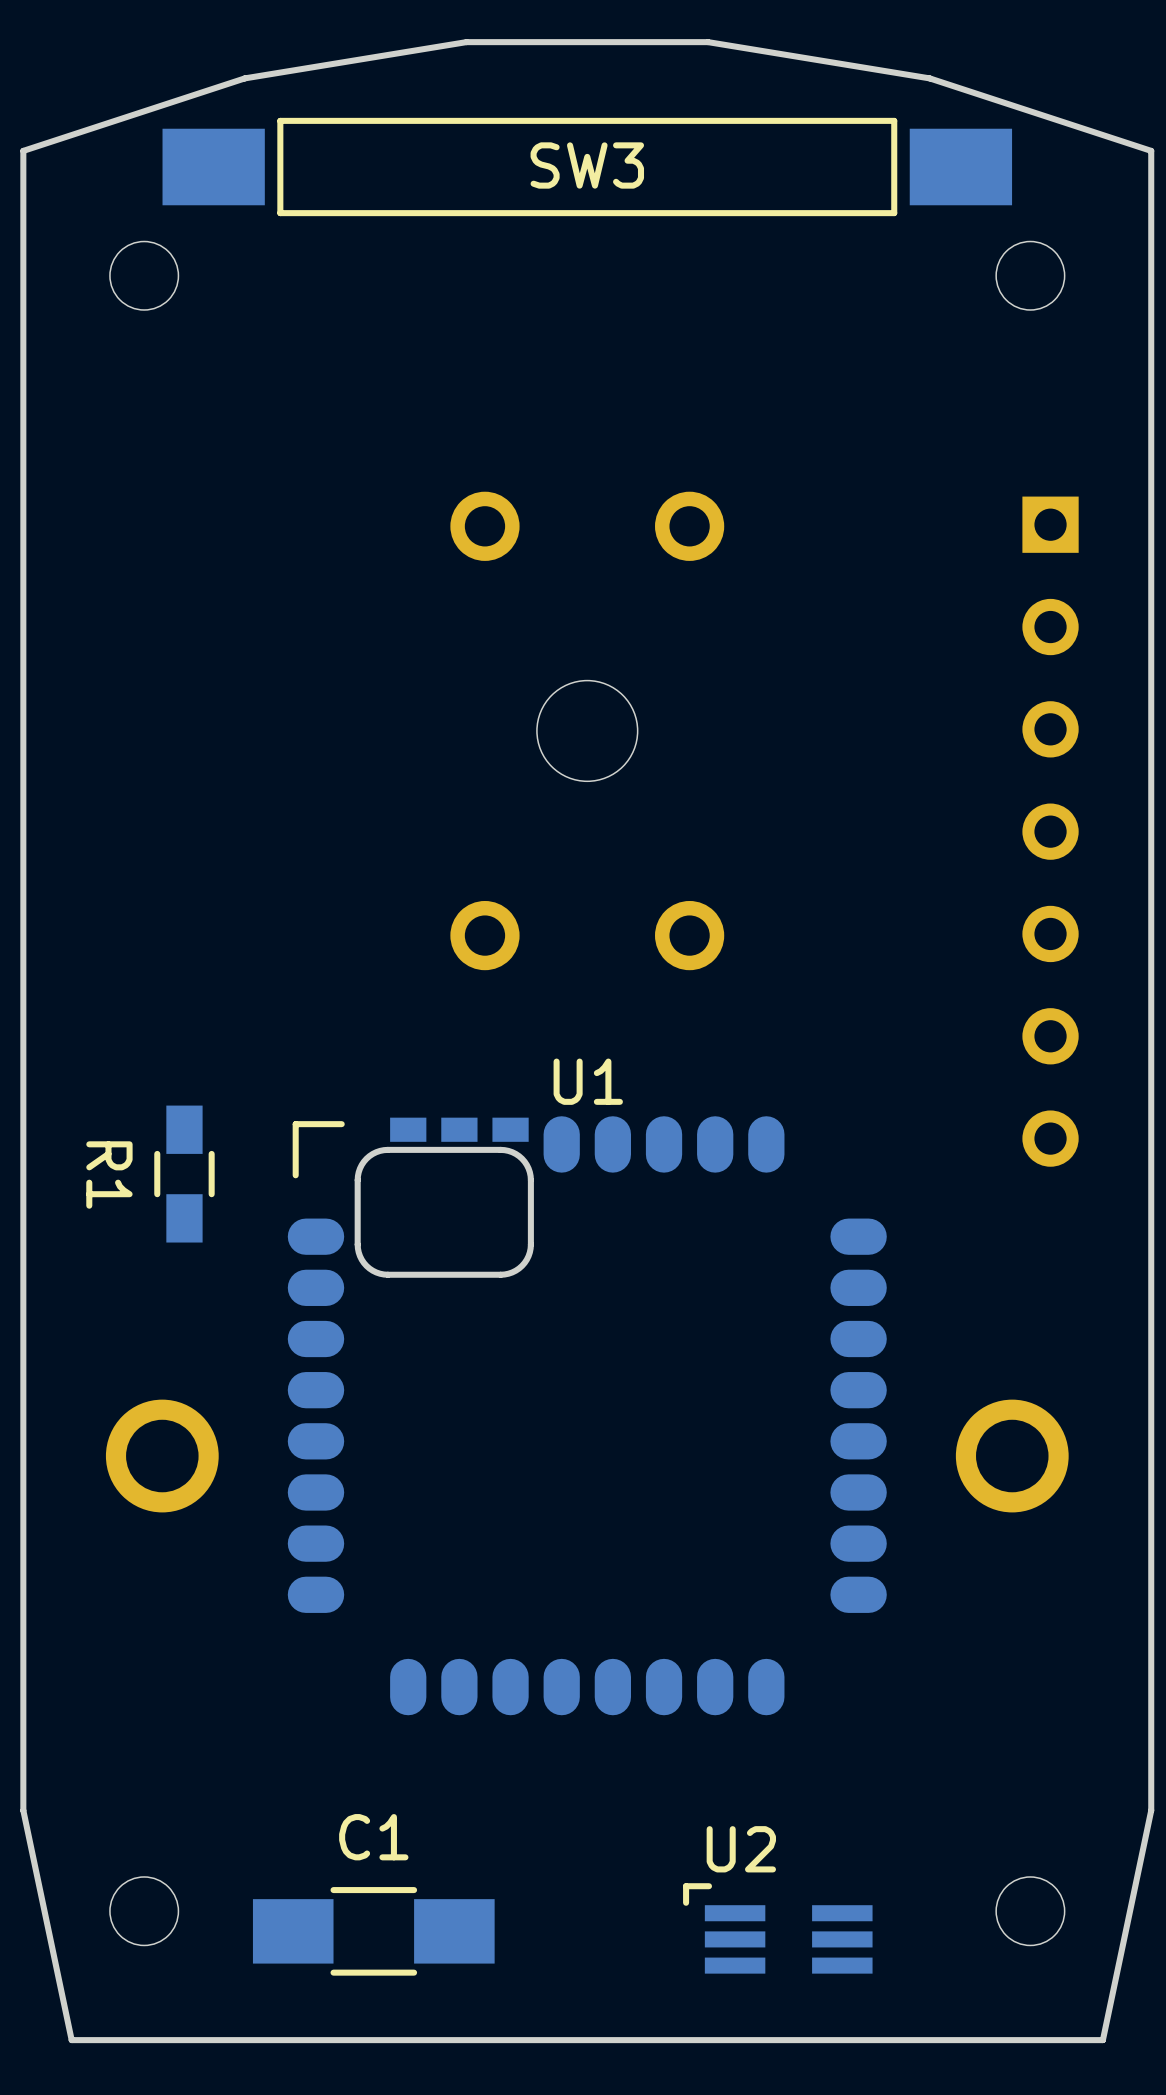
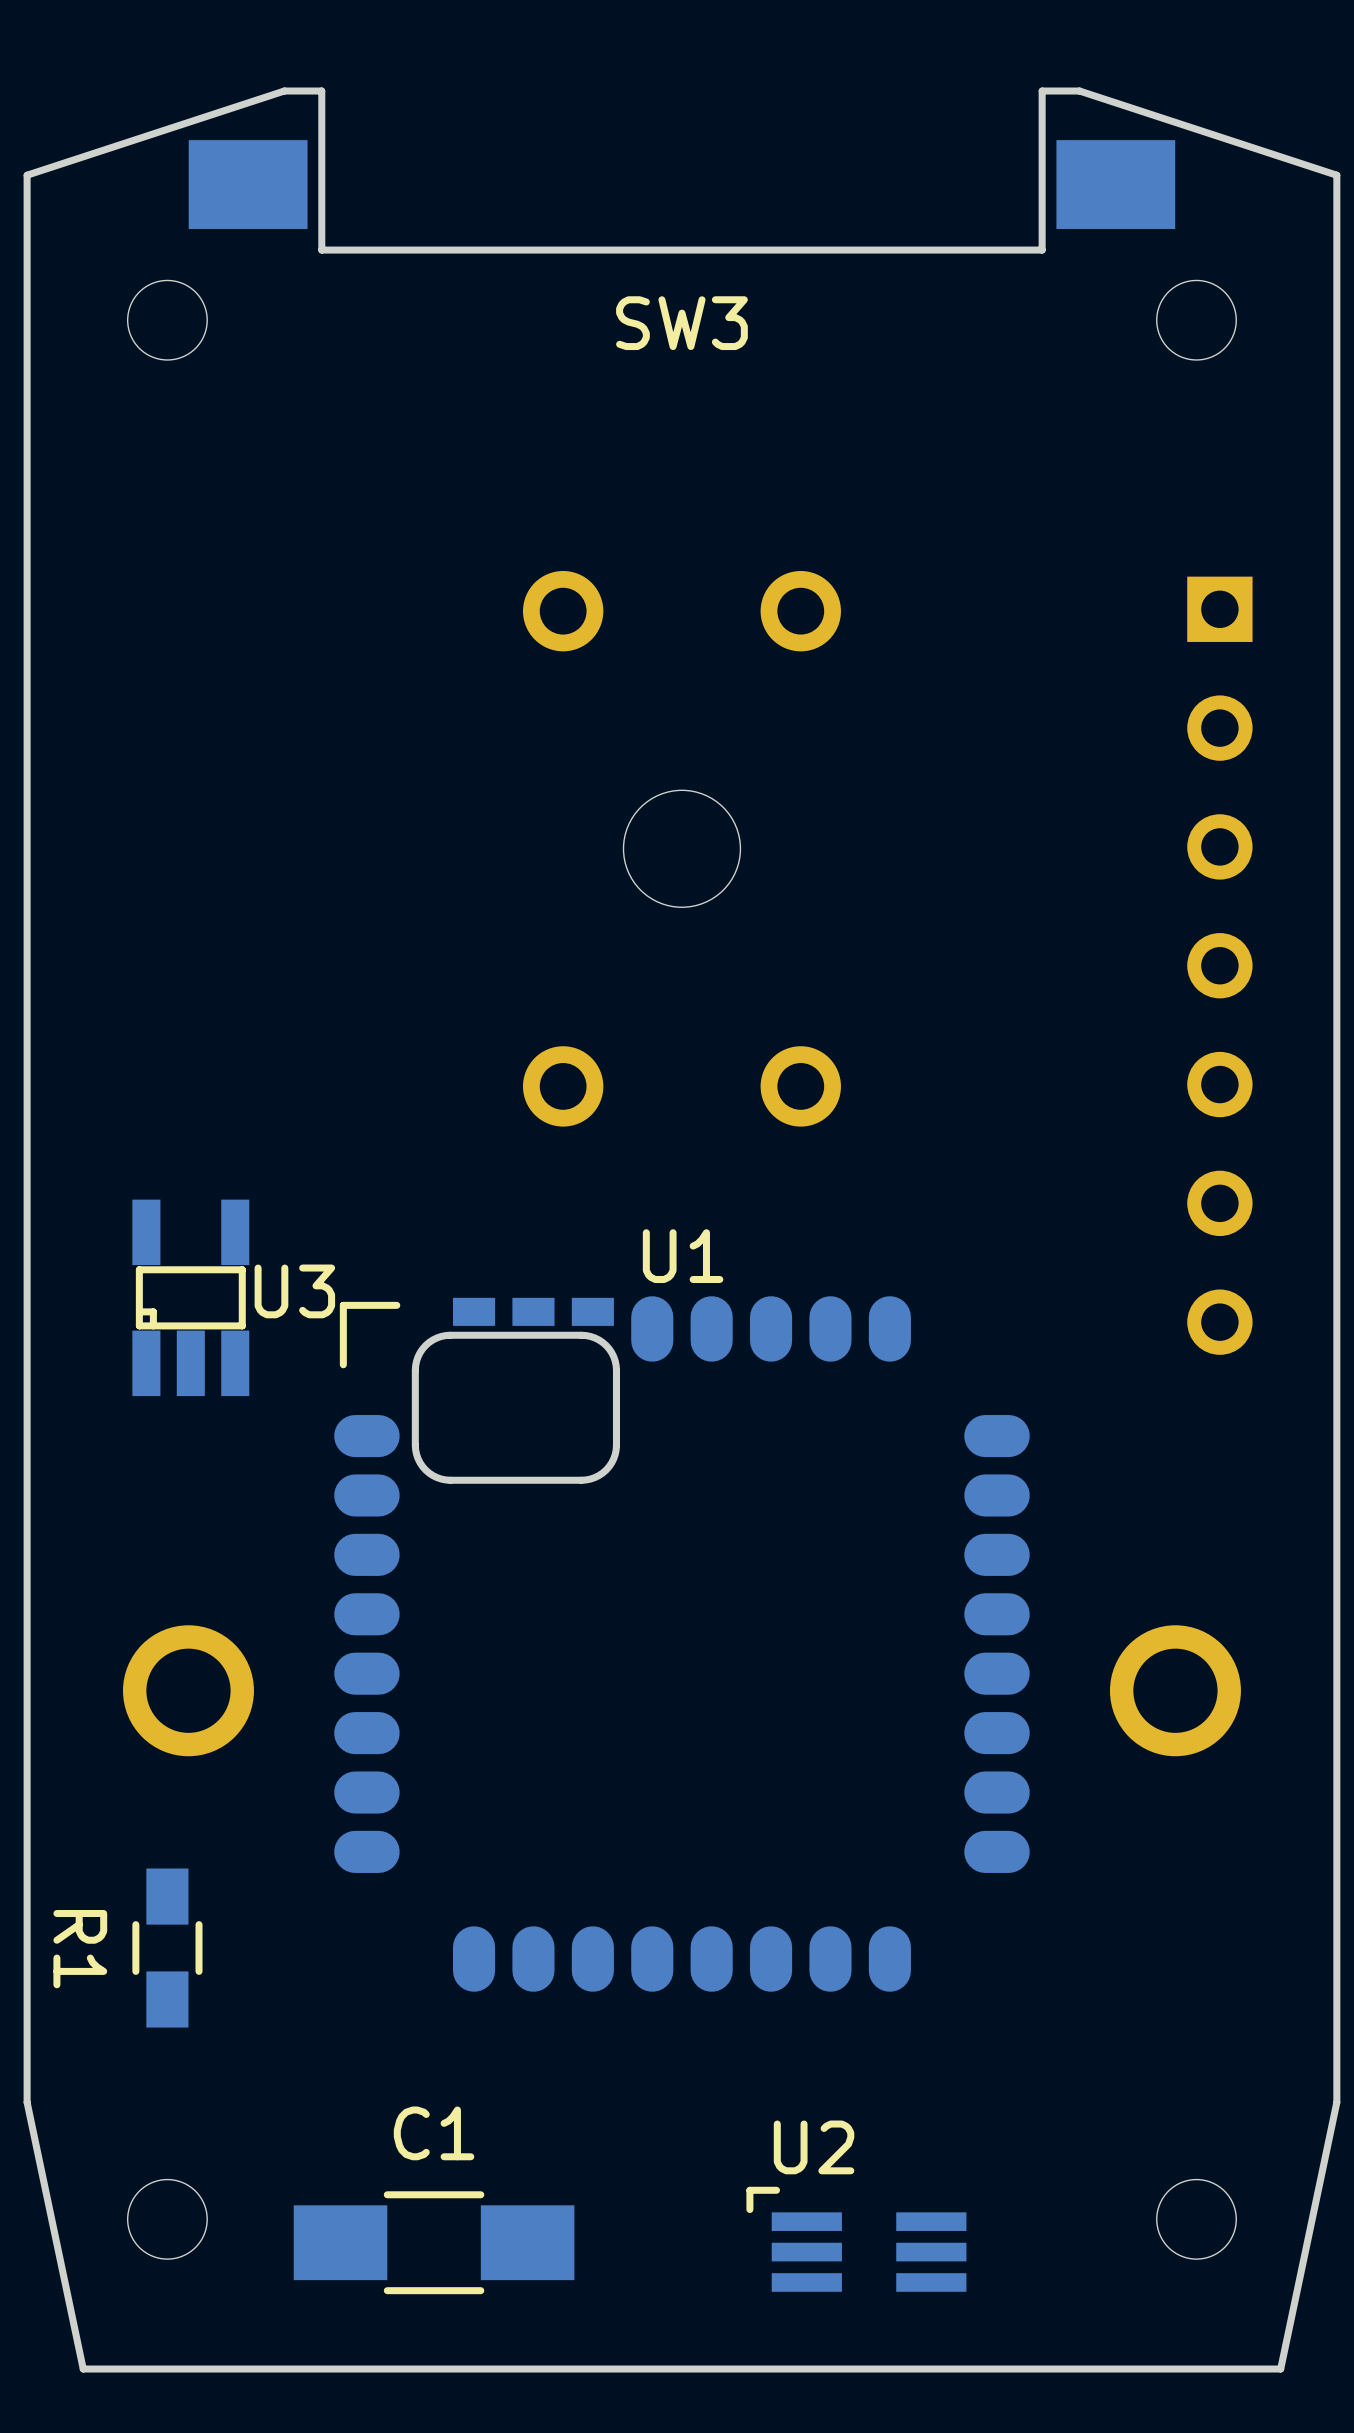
part footprint: [20, 39, 1155, 2044] -> [23, 87, 1341, 2373]
SW3 footprint: [162, 117, 1013, 217] -> [188, 140, 1176, 230]
SW3 name position: SW3 (587, 165) -> SW3 (681, 323)
U3: none -> (190, 1297)
R1 position: (184, 1174) -> (167, 1948)
U2 position: (777, 1928) -> (856, 2239)

